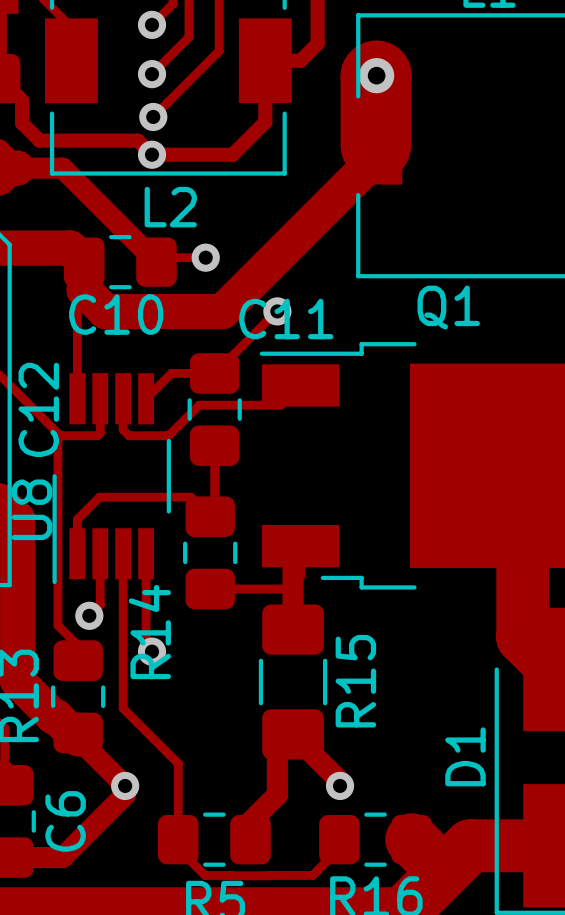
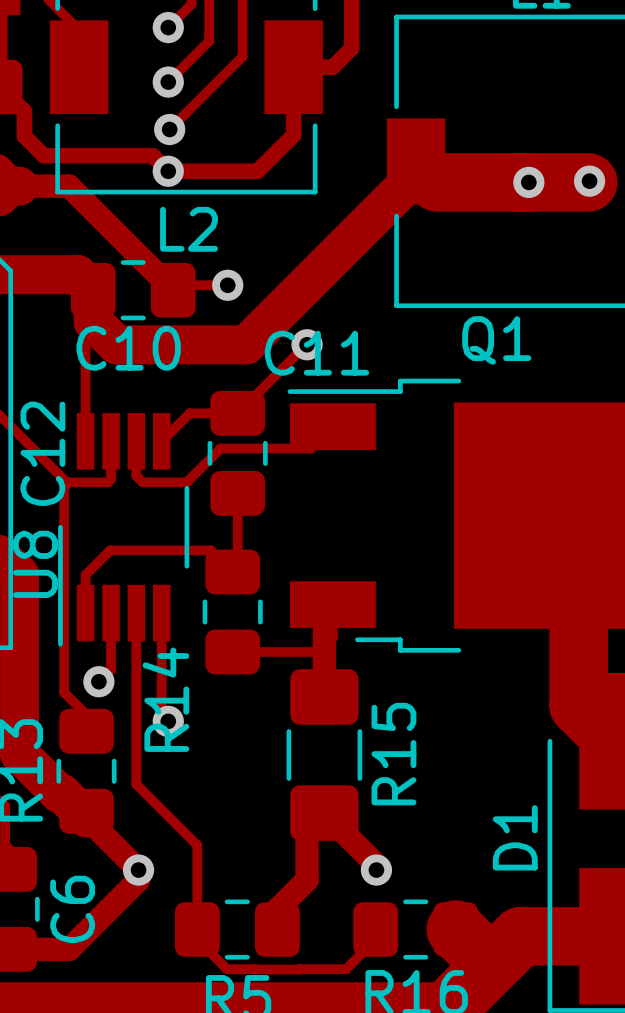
track: (376, 75) (375, 145) -> none
via: (376, 75) -> none
via: none -> (589, 181)
track: none -> (437, 182) (588, 182)
via: none -> (528, 182)

